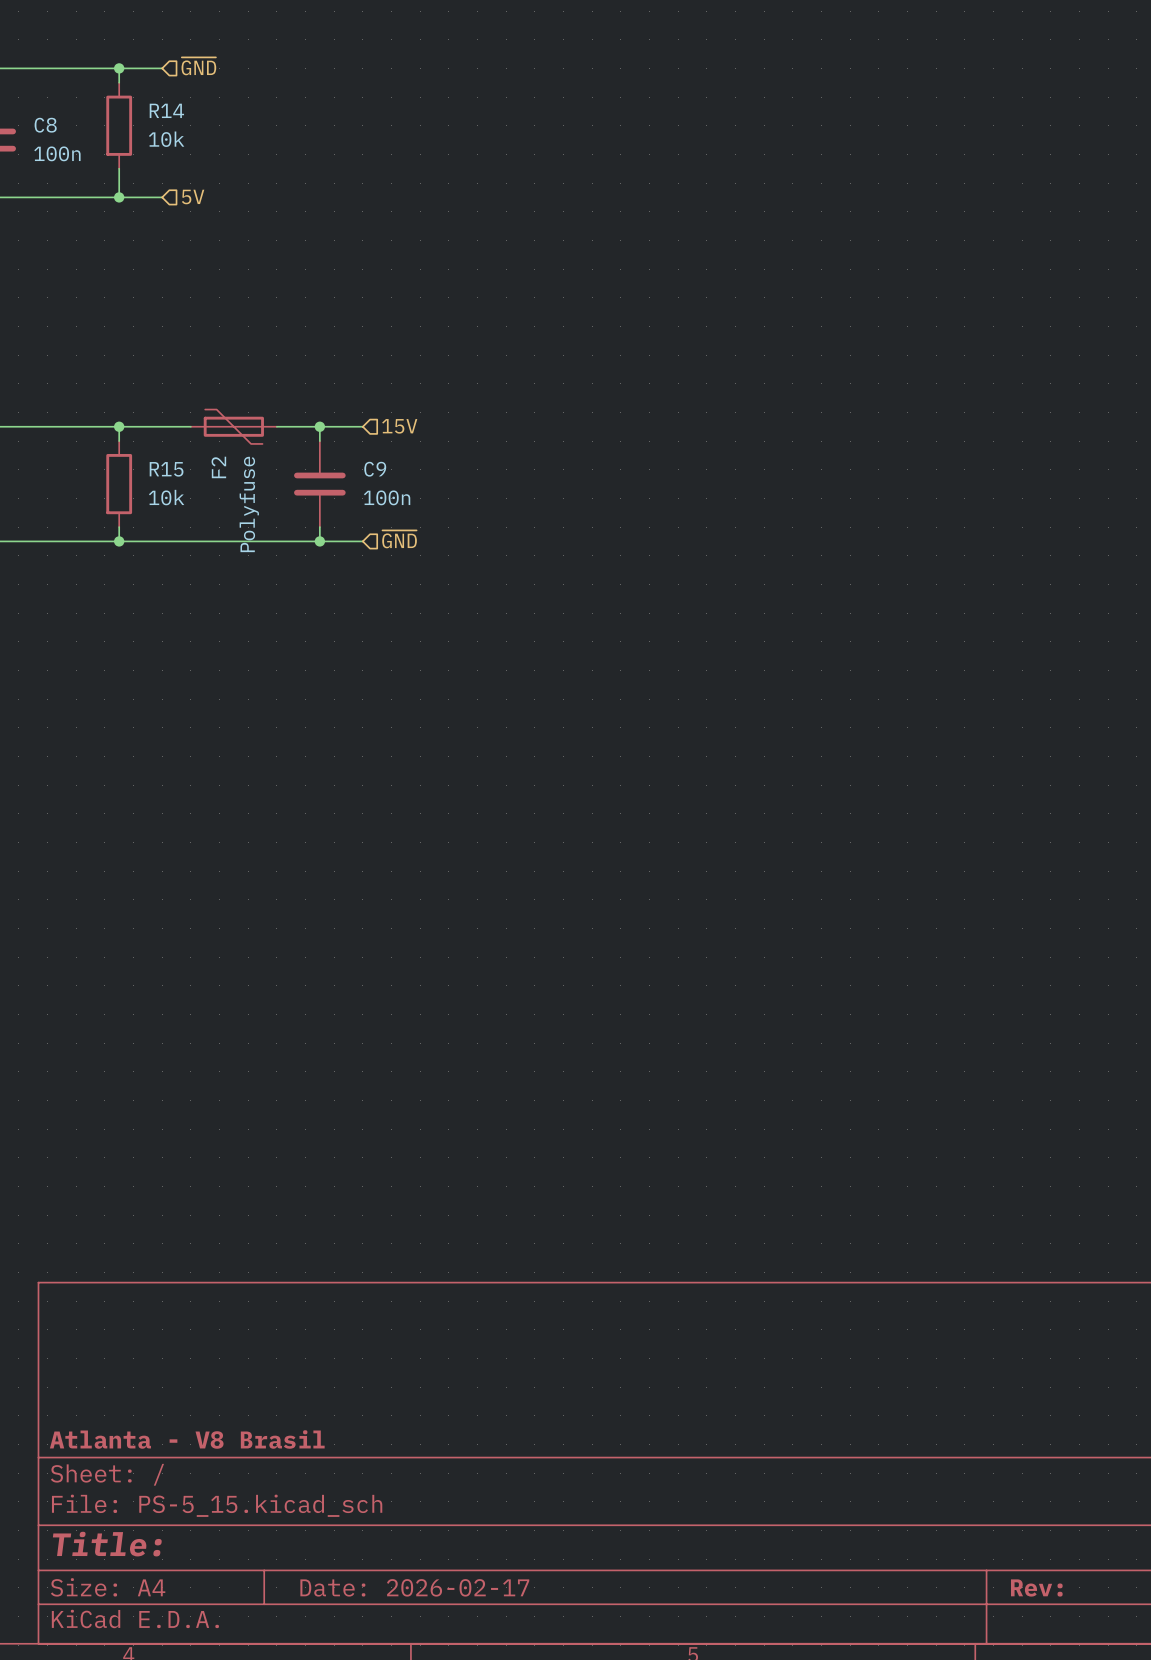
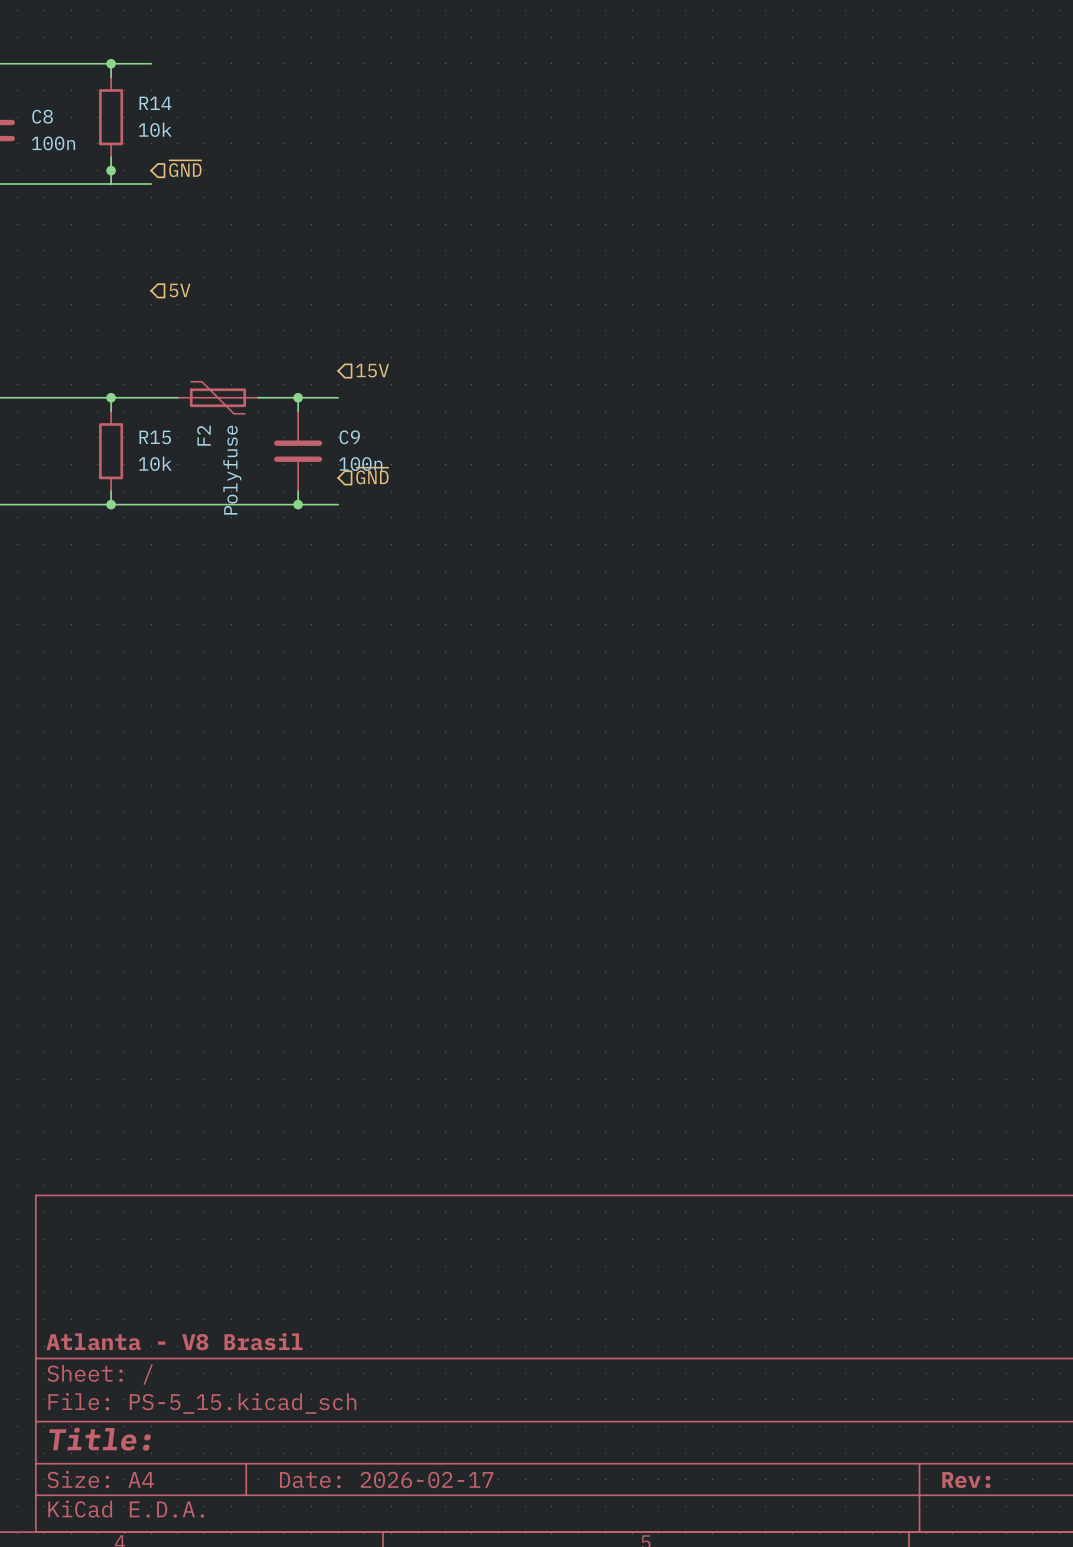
hierarchical label position: ~{GND} (198, 66) -> ~{GND} (185, 168)
hierarchical label position: 5V (193, 196) -> 5V (179, 290)
junction position: (119, 197) -> (111, 170)
hierarchical label position: 15V (399, 426) -> 15V (372, 370)
hierarchical label position: ~{GND} (399, 539) -> ~{GND} (372, 475)

